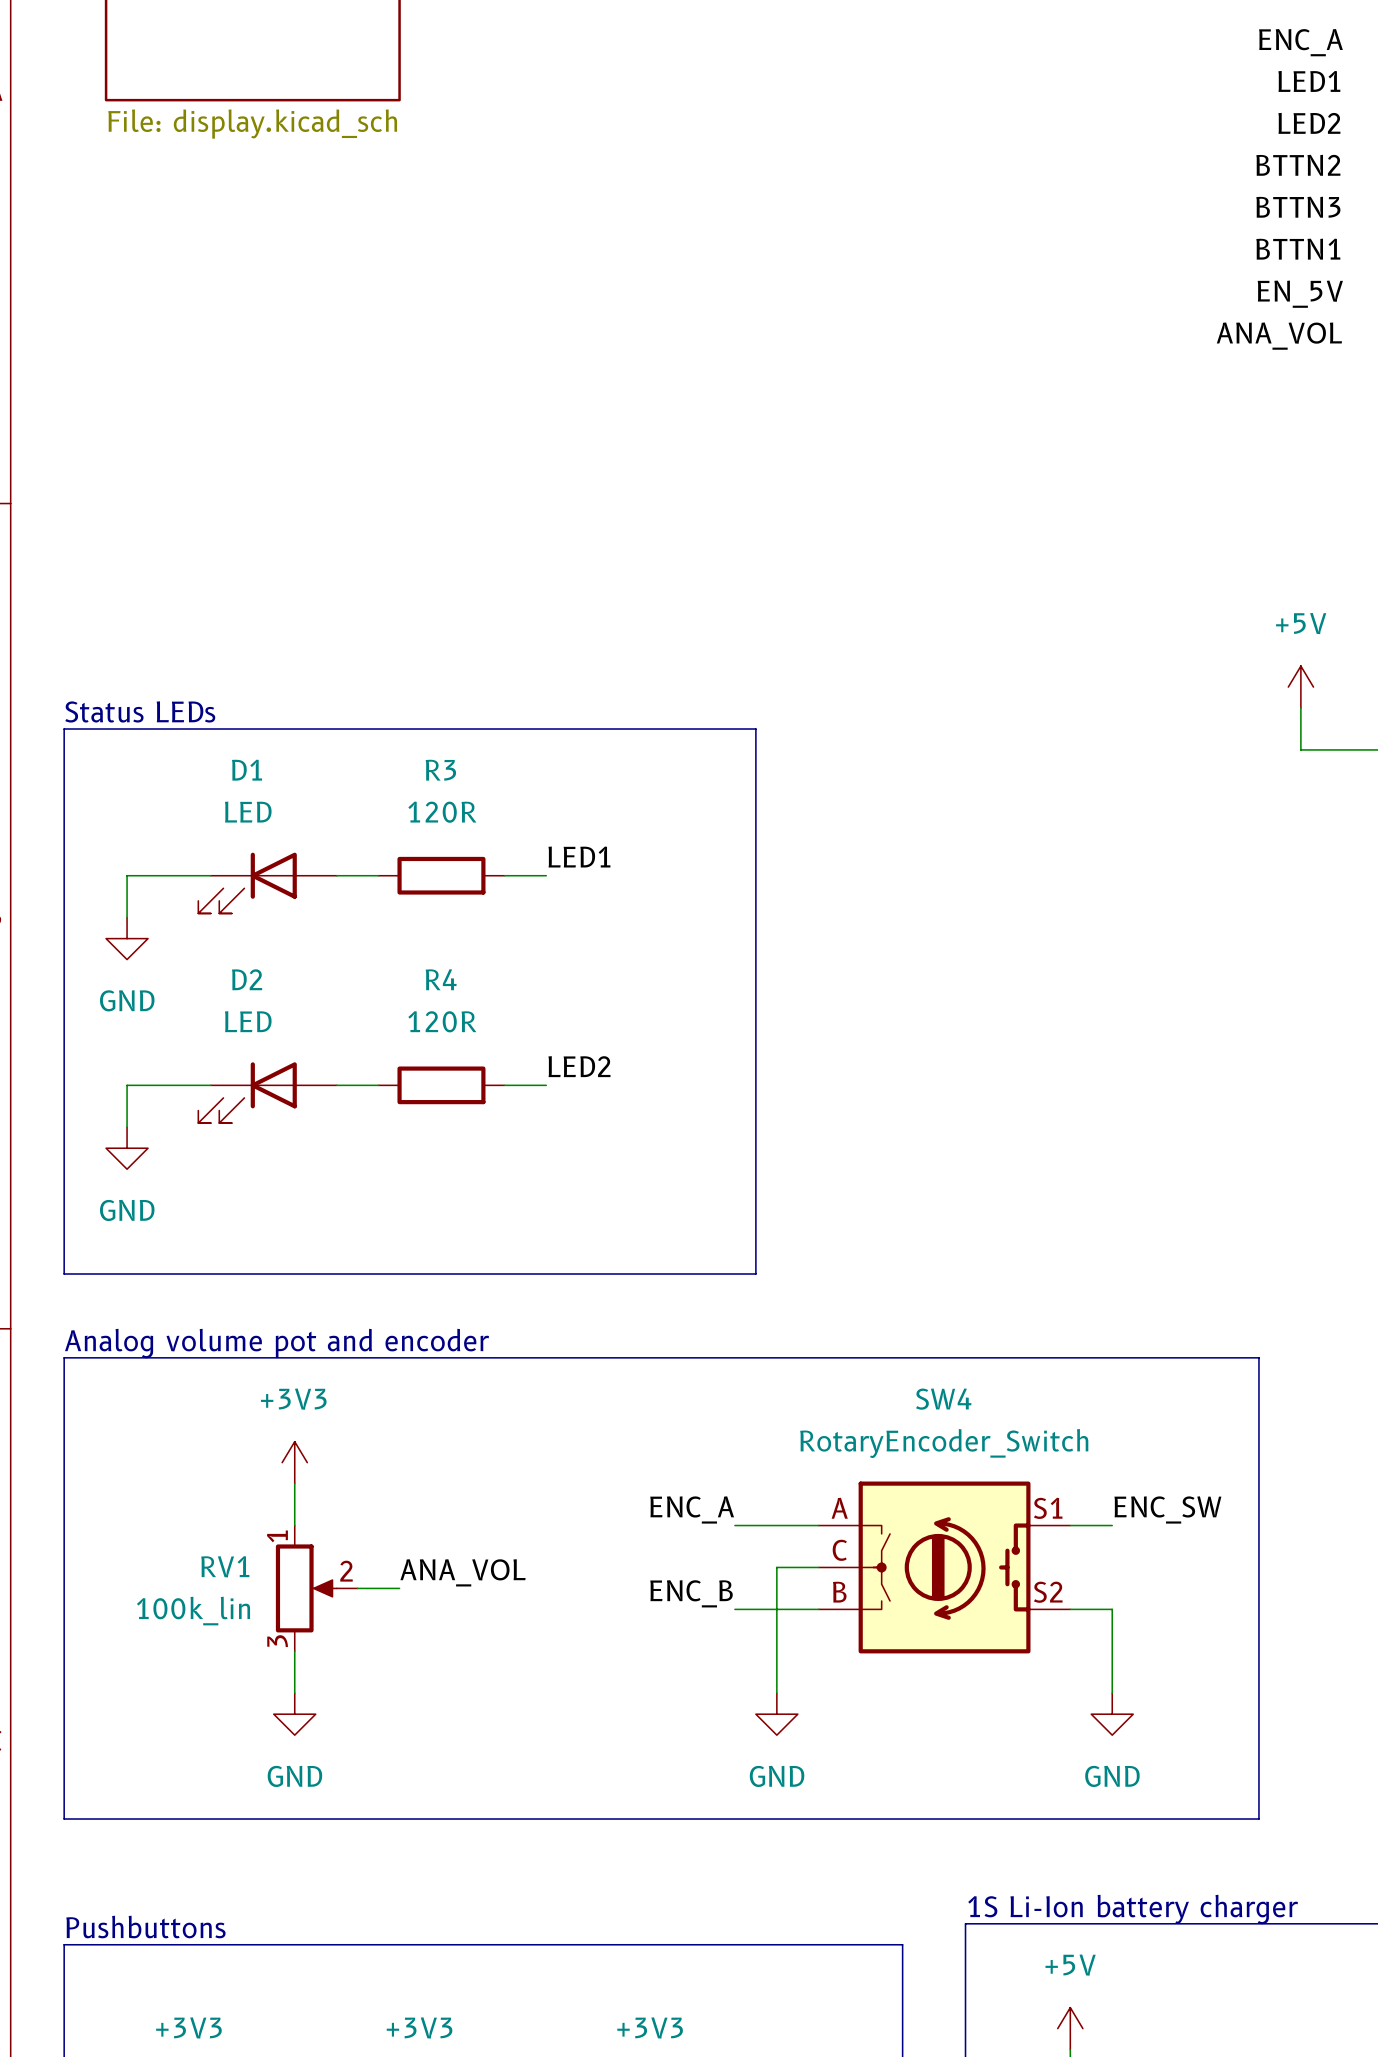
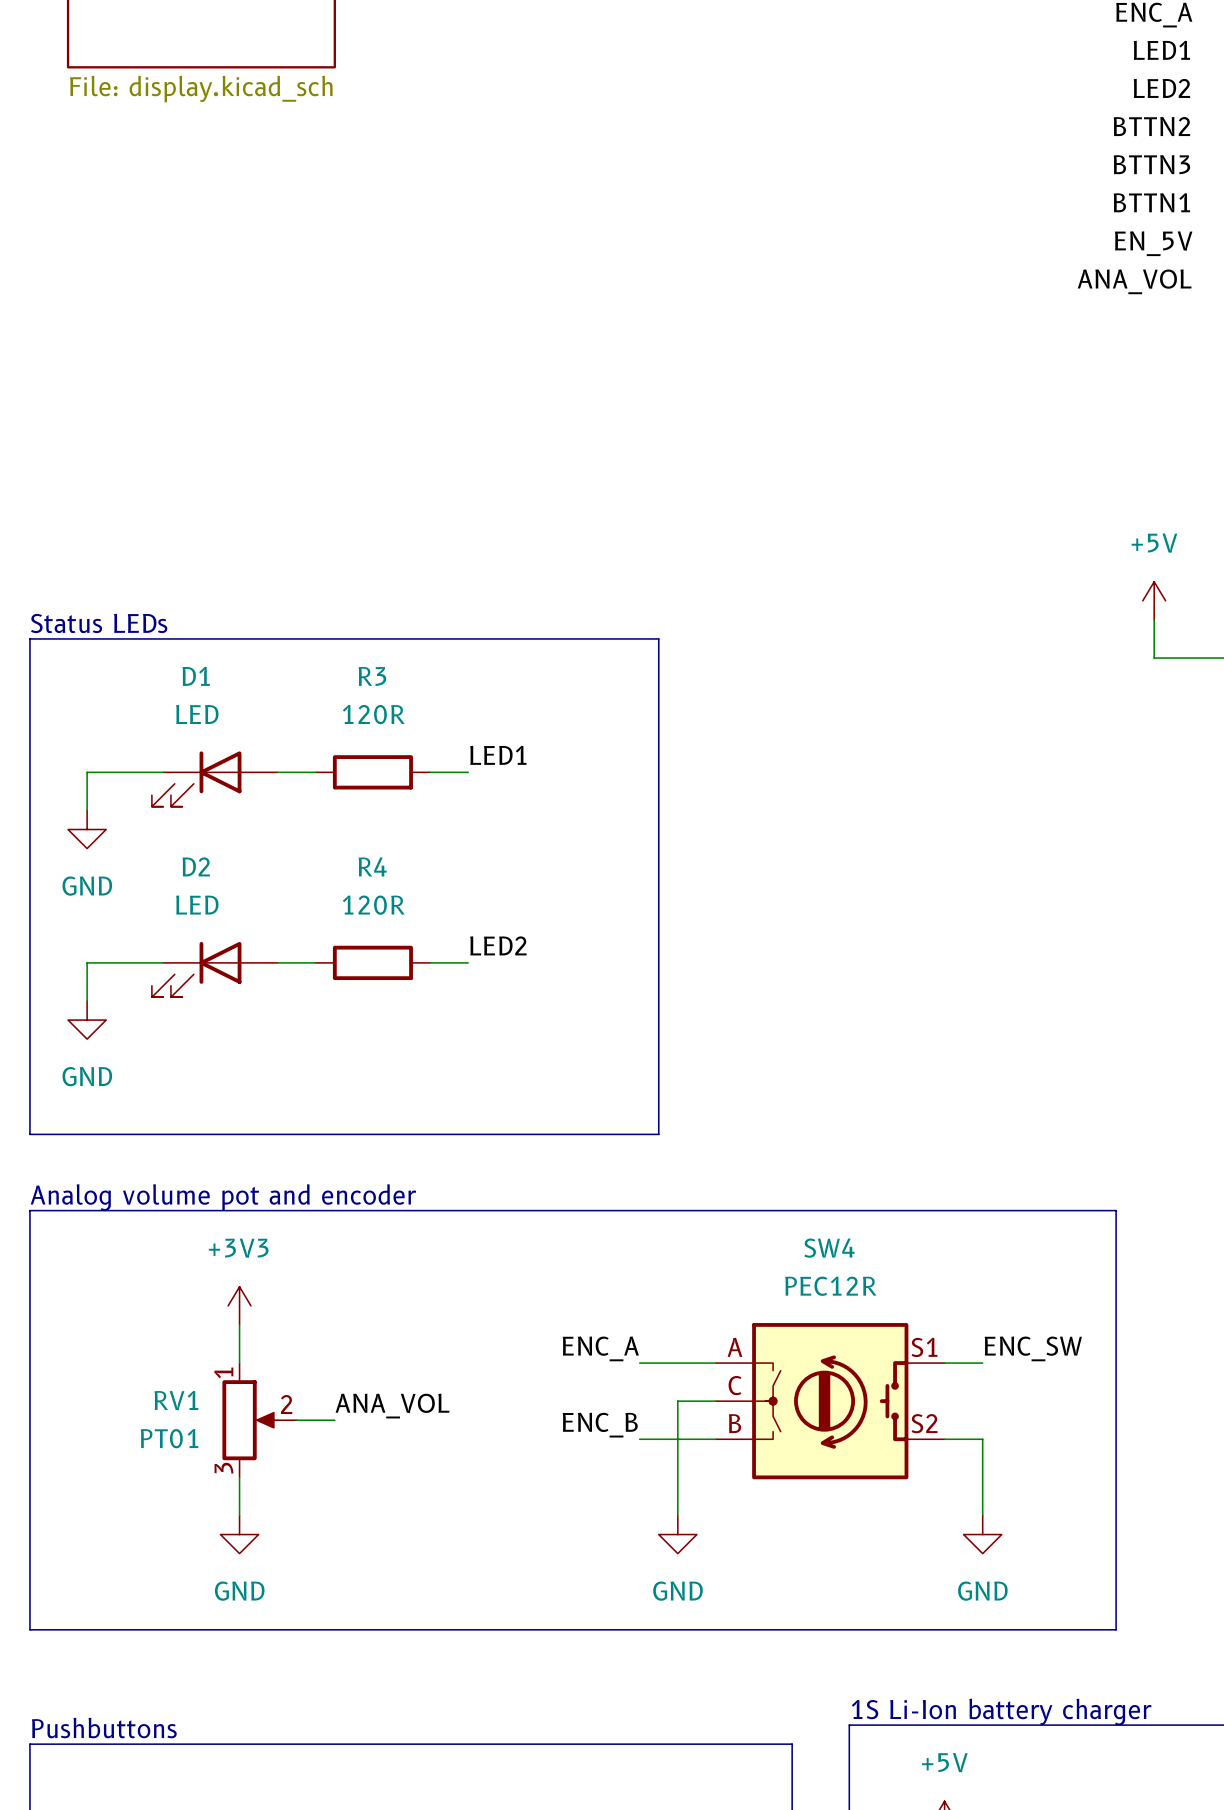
SW4 value: RotaryEncoder_Switch (944, 1443) -> PEC12R (830, 1286)
RV1 value: 100k_lin (193, 1611) -> PT01 (169, 1438)

